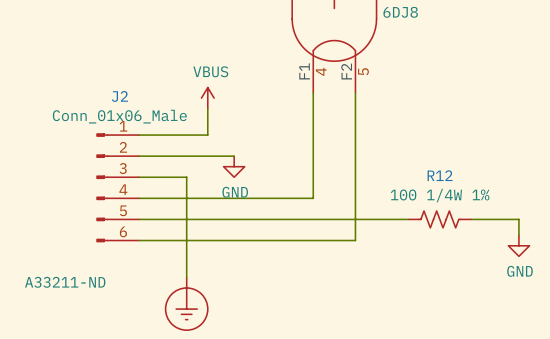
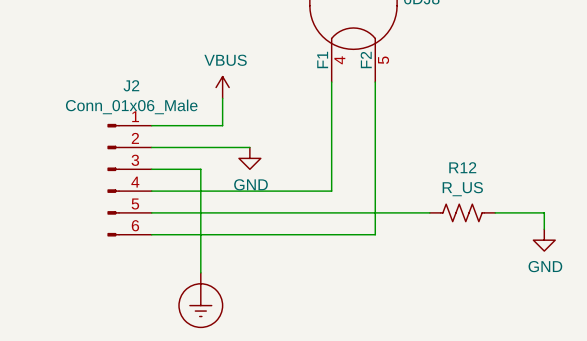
R12 value: 100 1/4W 1% (440, 195) -> R_US (462, 189)
J2 text: A33211-ND (65, 282) -> none

